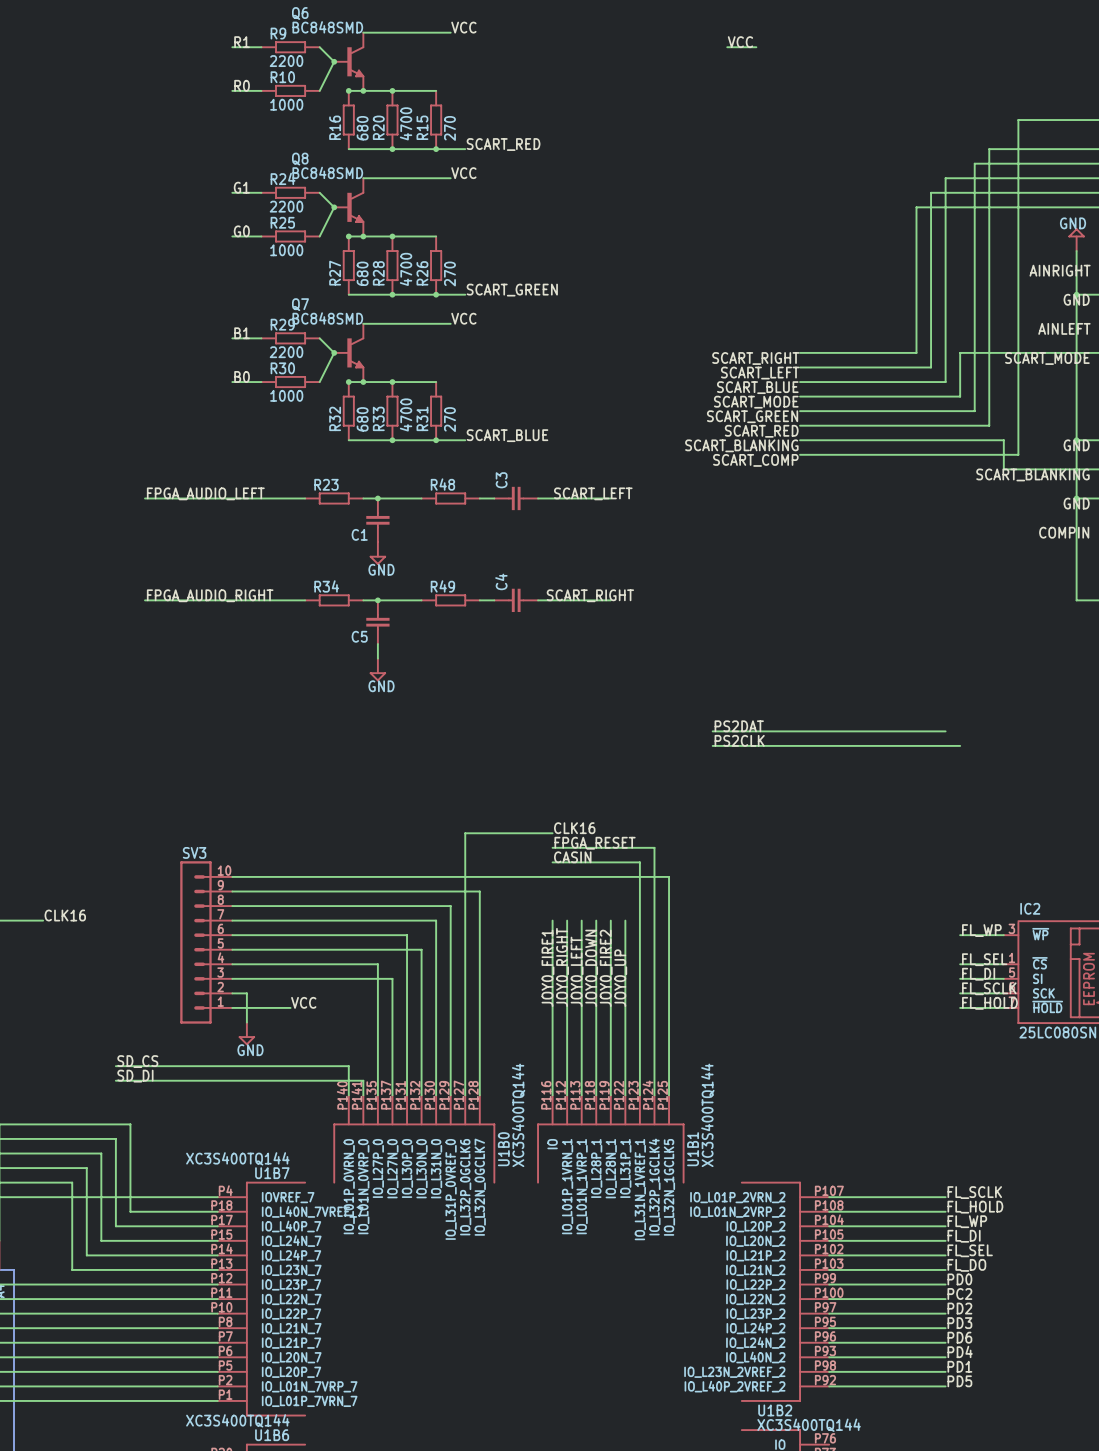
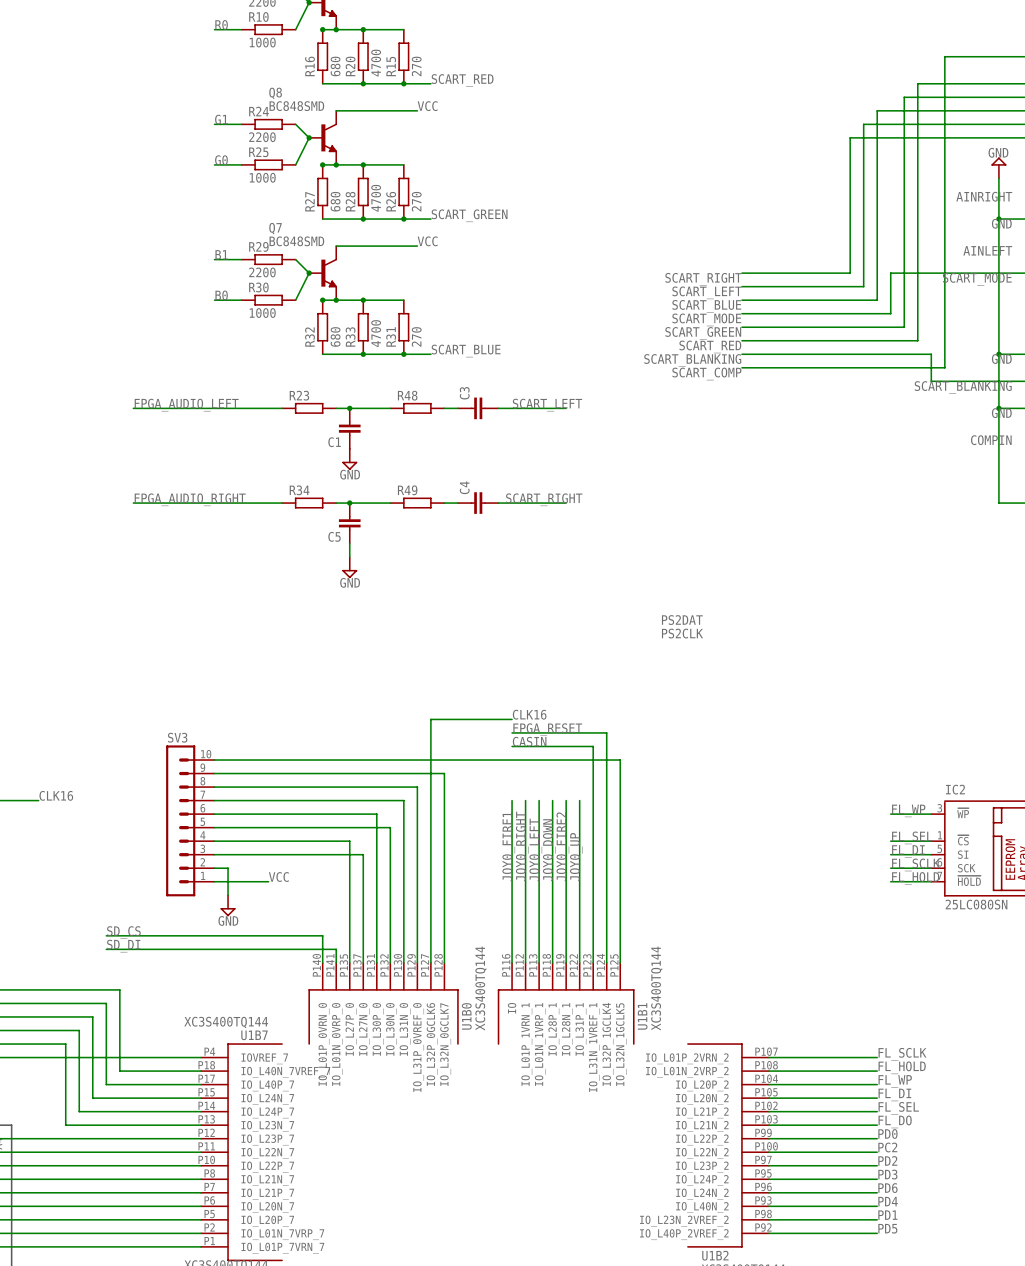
wire: (712, 731) (945, 731) -> none
wire: (712, 745) (960, 745) -> none

